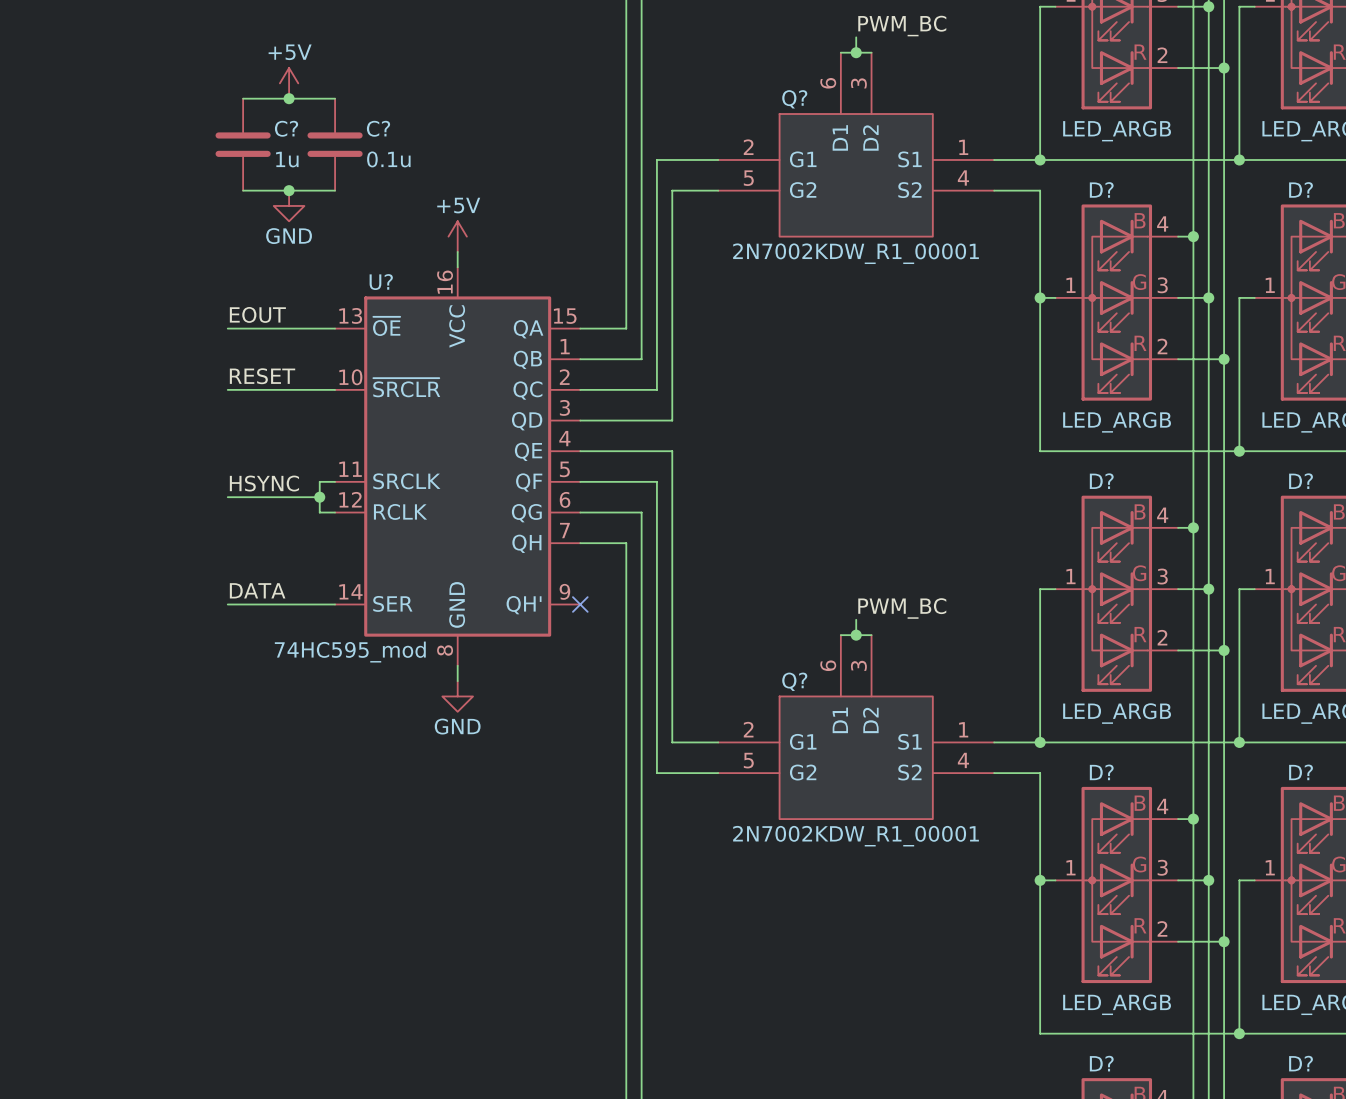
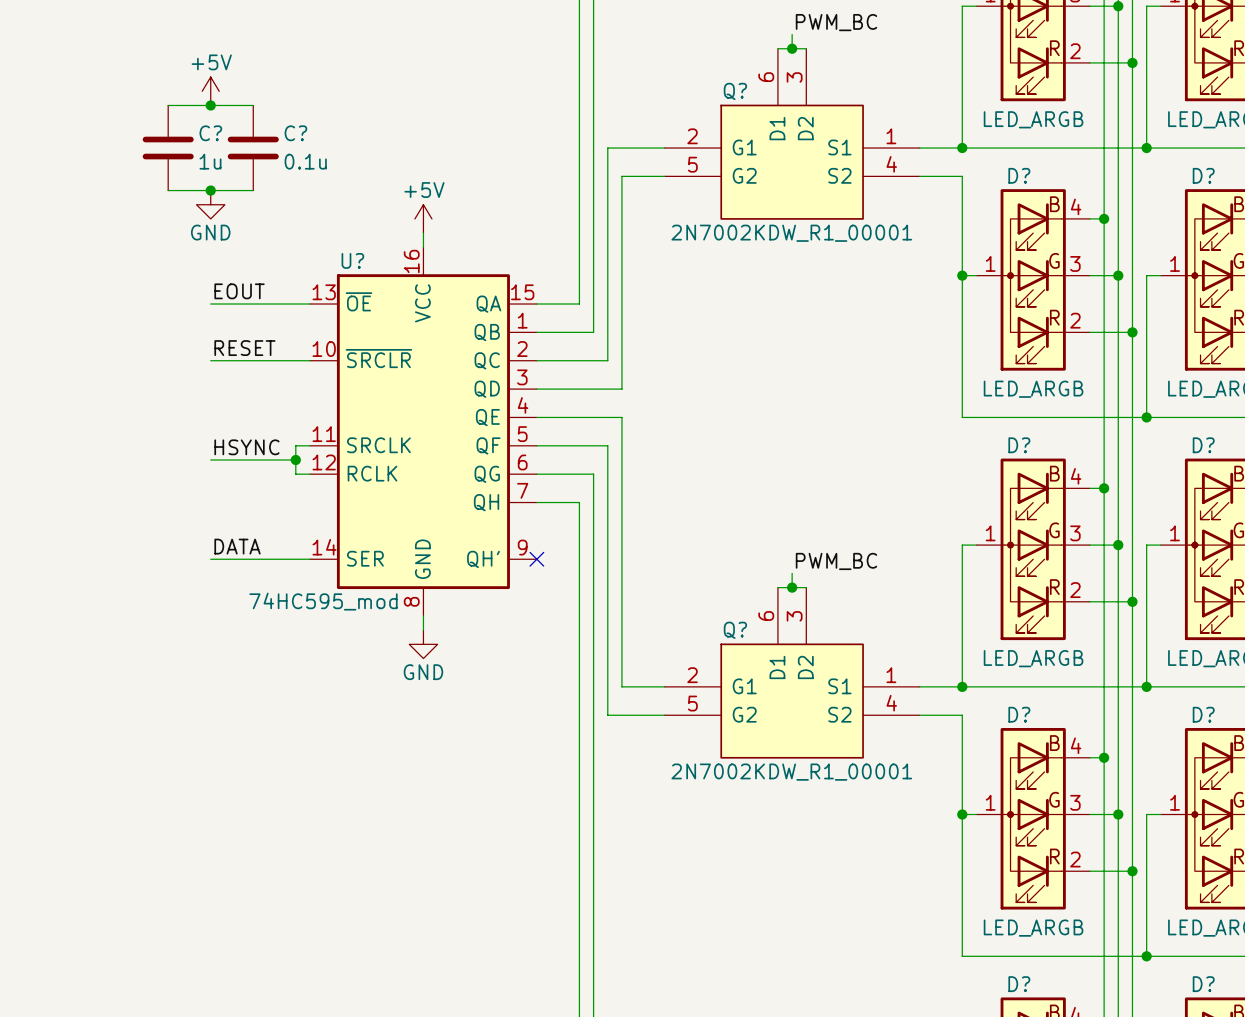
power symbol position: +5V (289, 83) -> +5V (210, 91)
wire: (243, 98) (335, 98) -> (168, 105) (253, 105)
junction: (289, 98) -> none
junction: none -> (210, 105)
C? position: (243, 144) -> (168, 148)
C? position: (335, 144) -> (253, 148)
wire: (243, 190) (335, 190) -> (168, 190) (253, 190)
junction: (289, 190) -> none
junction: none -> (210, 190)
power symbol position: GND (289, 205) -> GND (210, 204)

